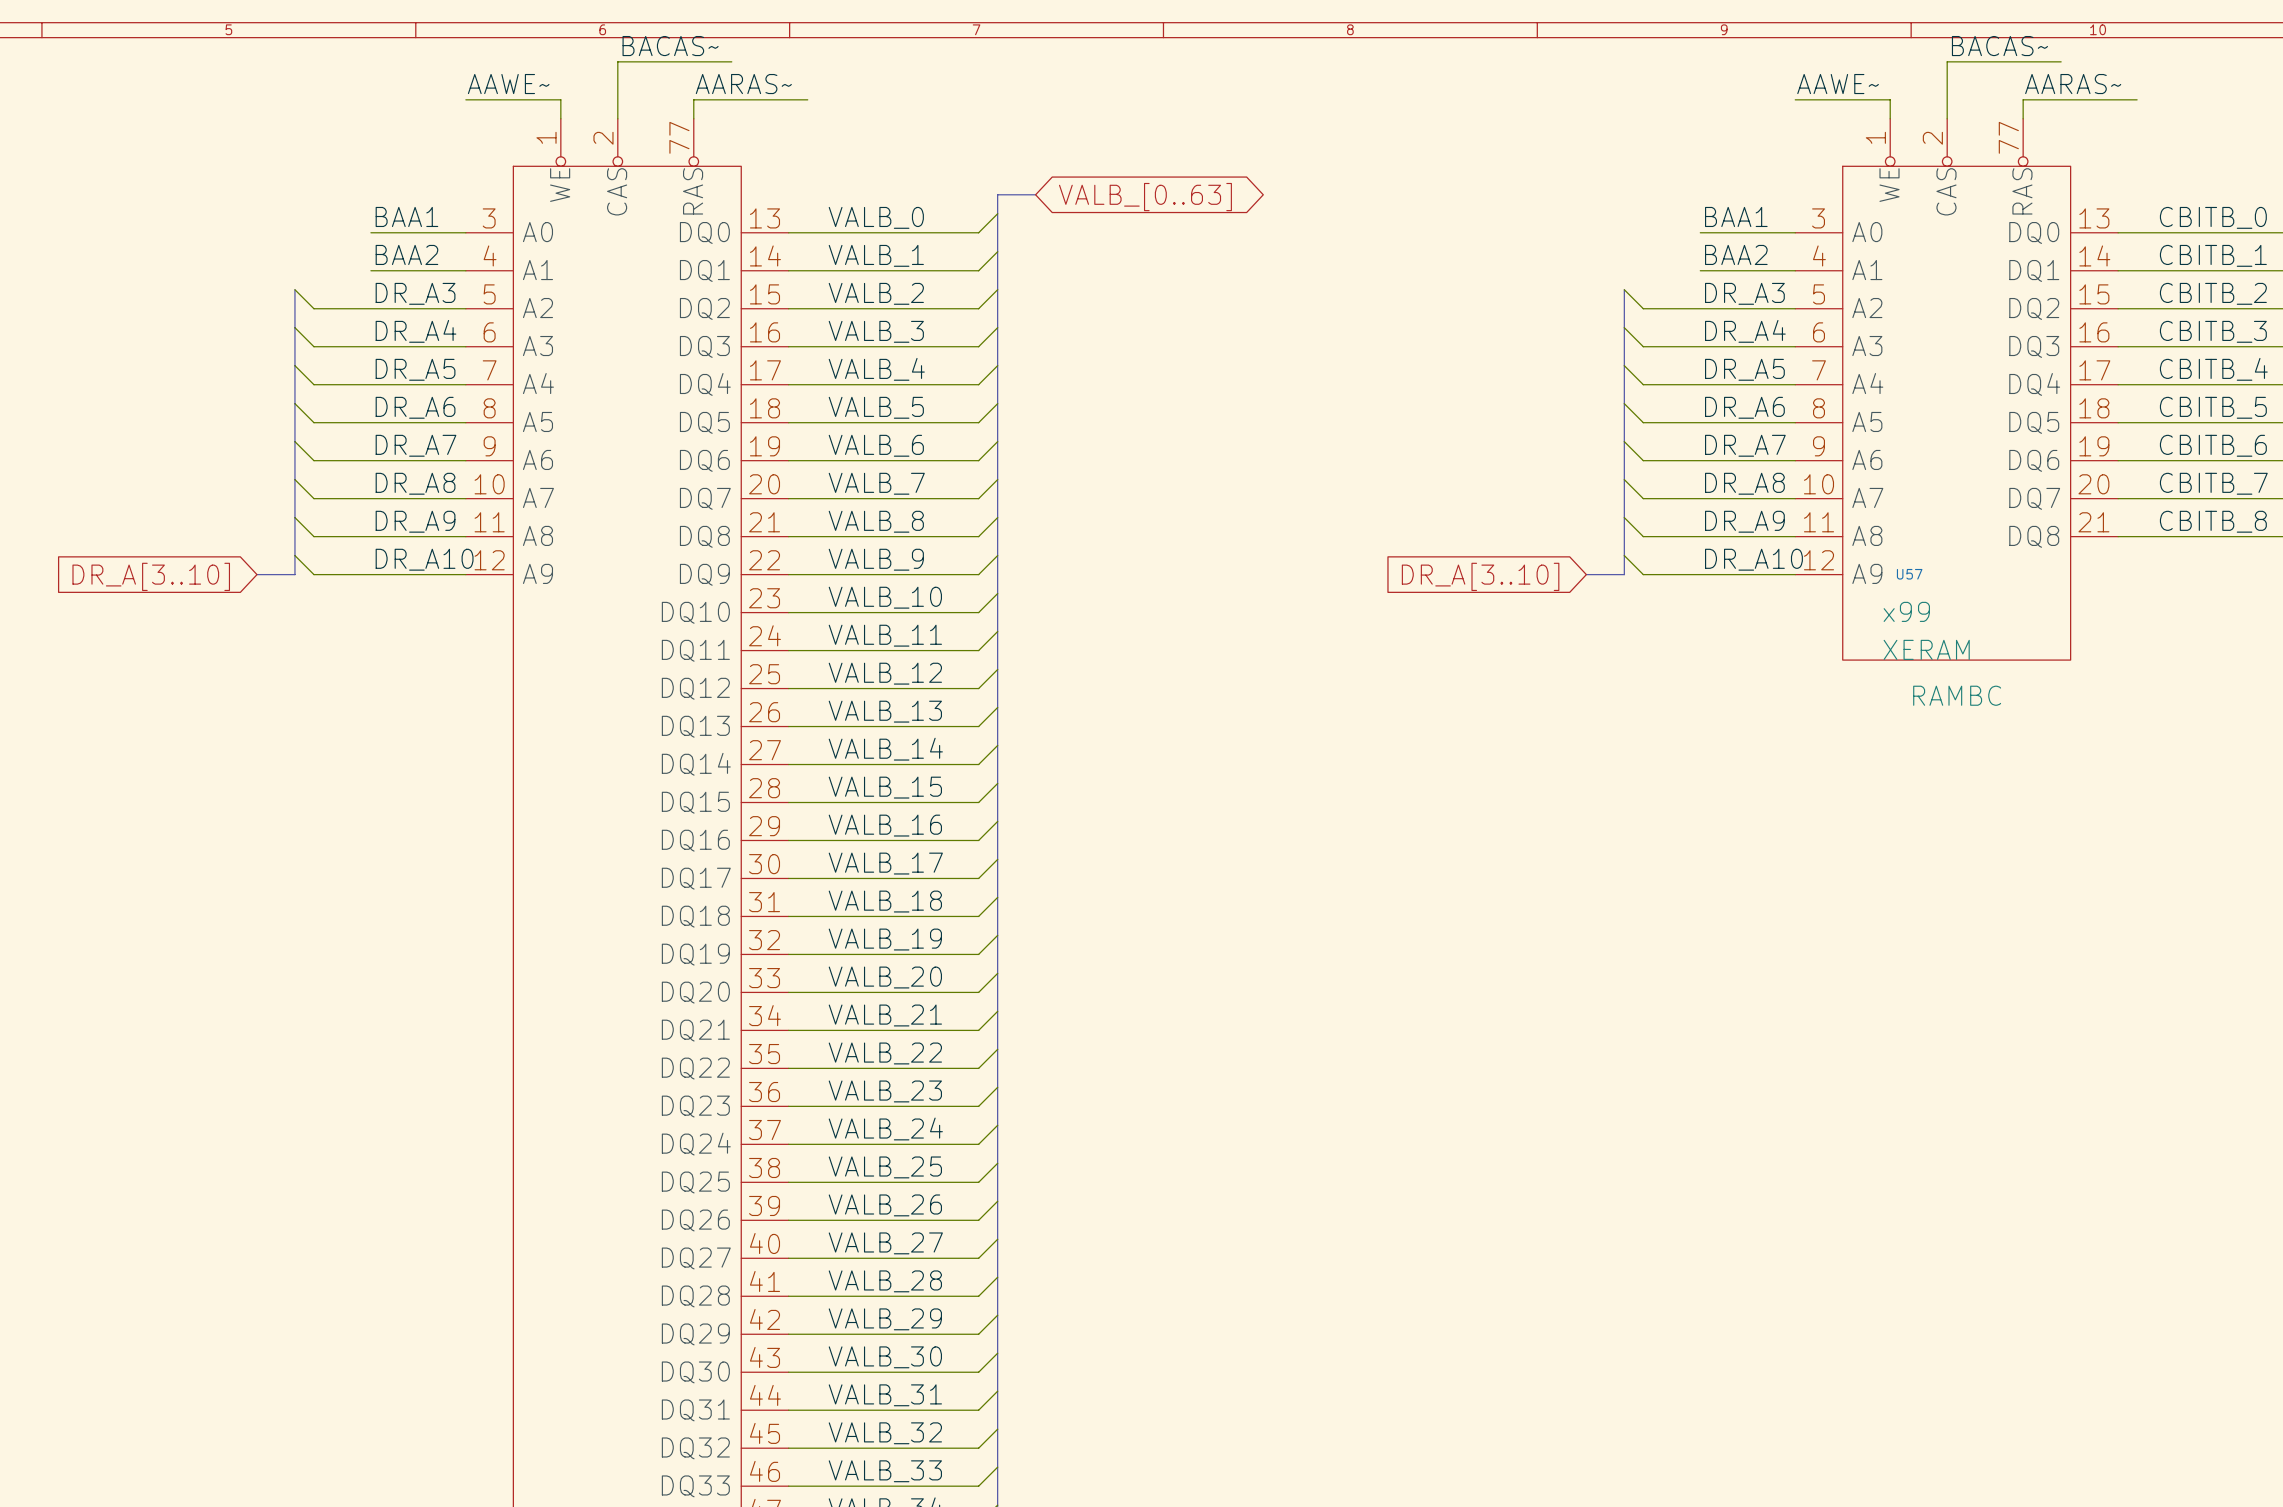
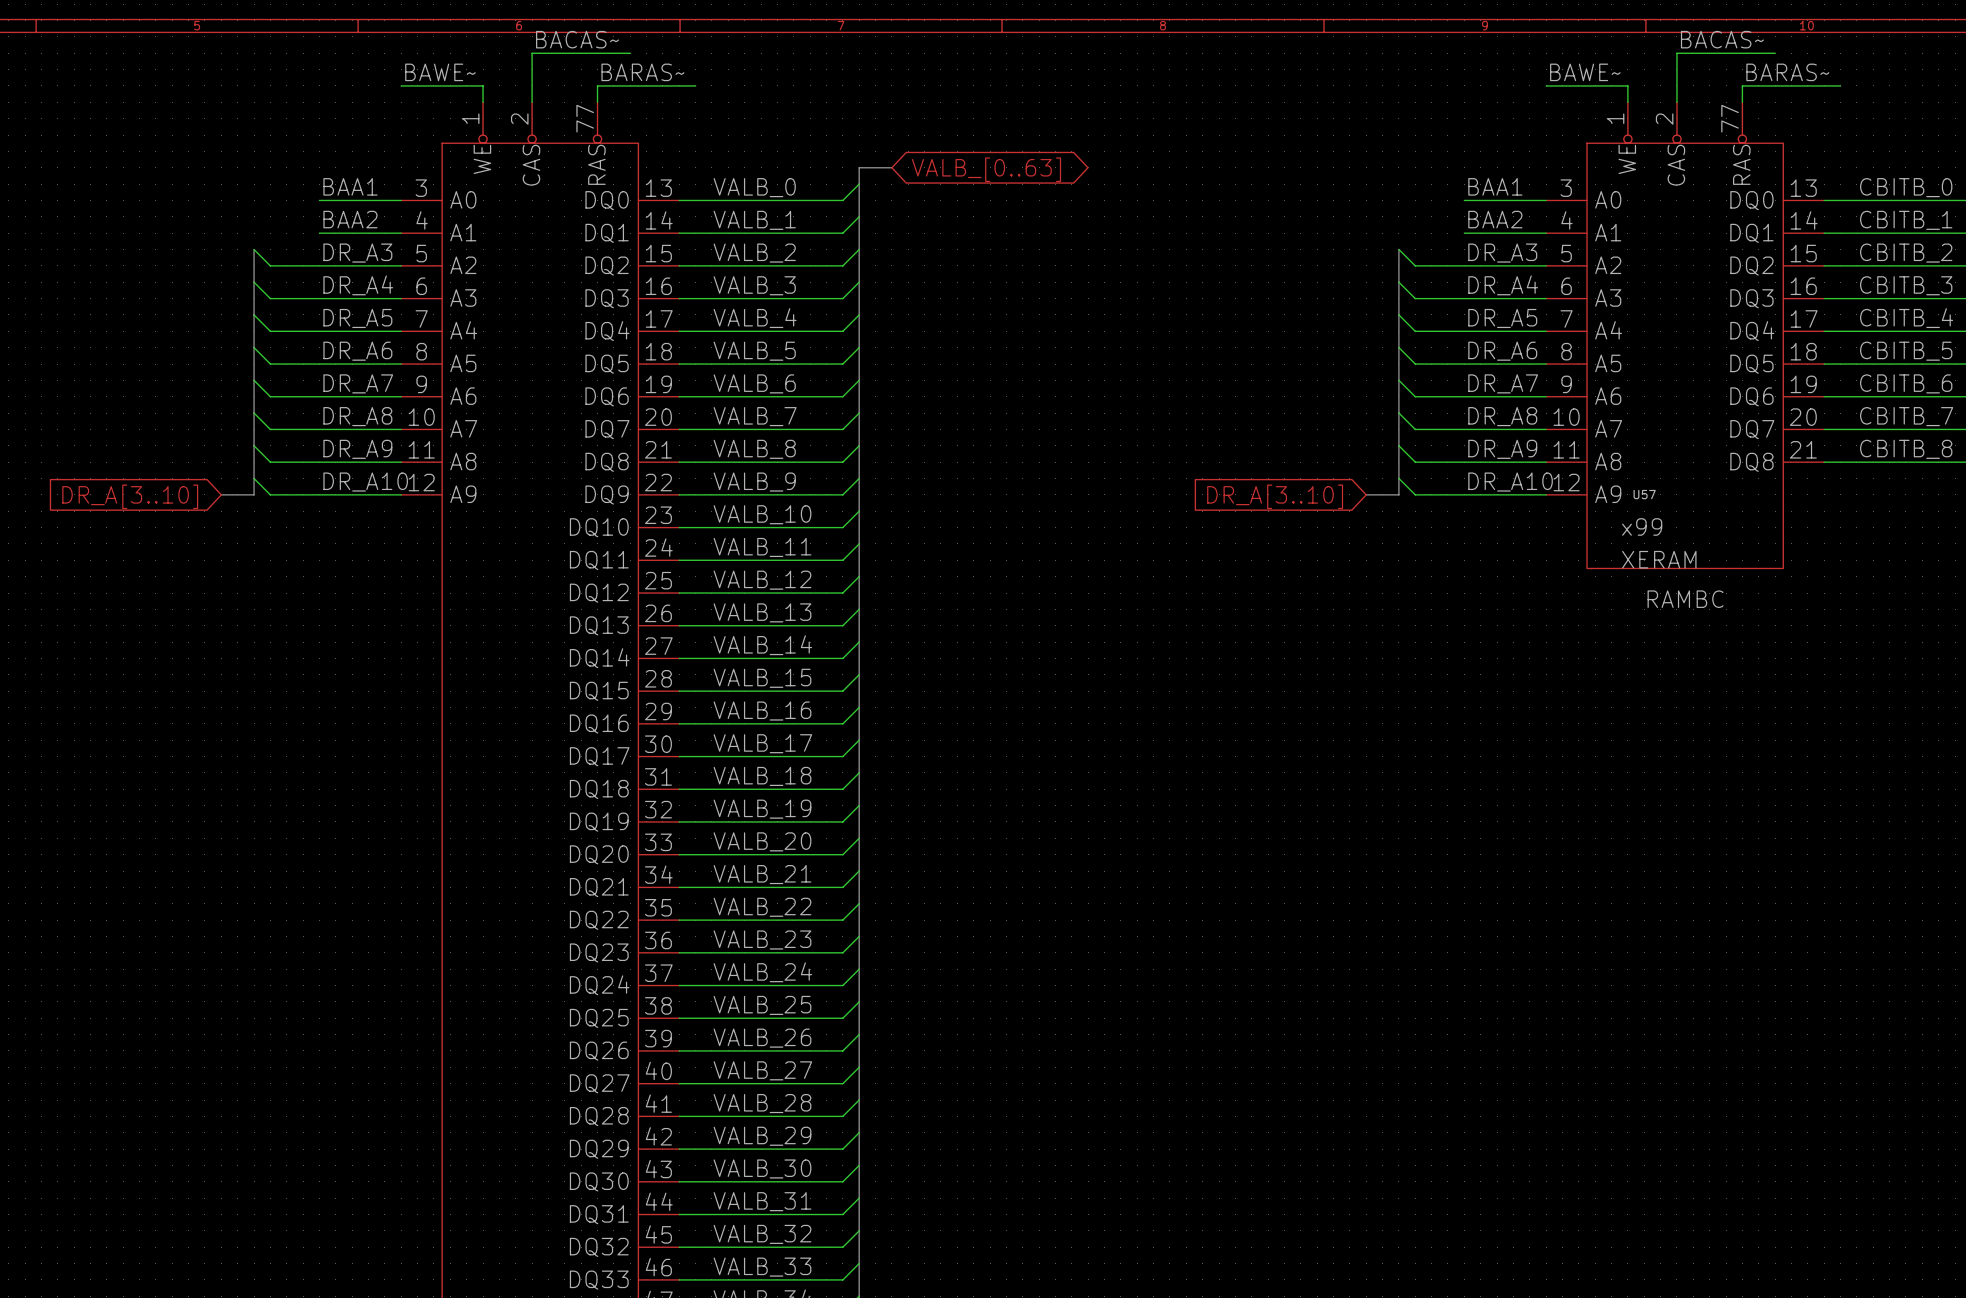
label: AAWE~ (508, 84) -> BAWE~ (440, 72)
label: AARAS~ (743, 84) -> BARAS~ (642, 72)
label: AAWE~ (1838, 84) -> BAWE~ (1585, 72)
label: AARAS~ (2073, 84) -> BARAS~ (1787, 72)

